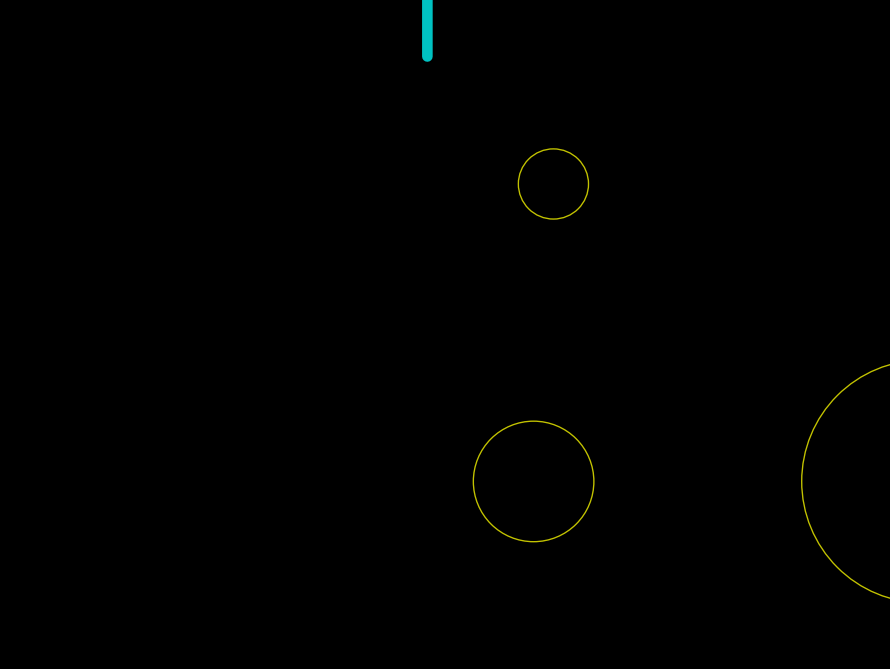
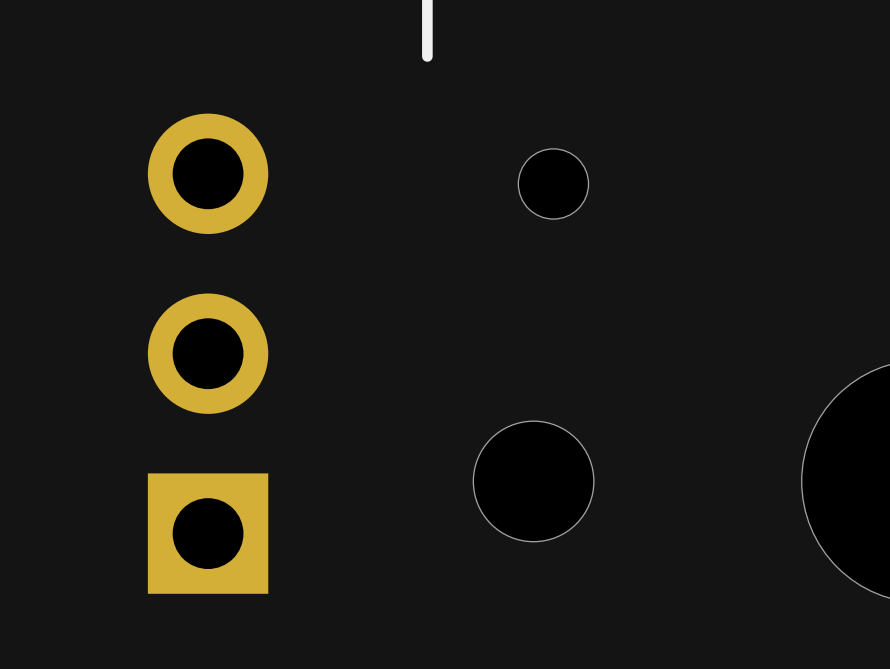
part: none -> (208, 353)

